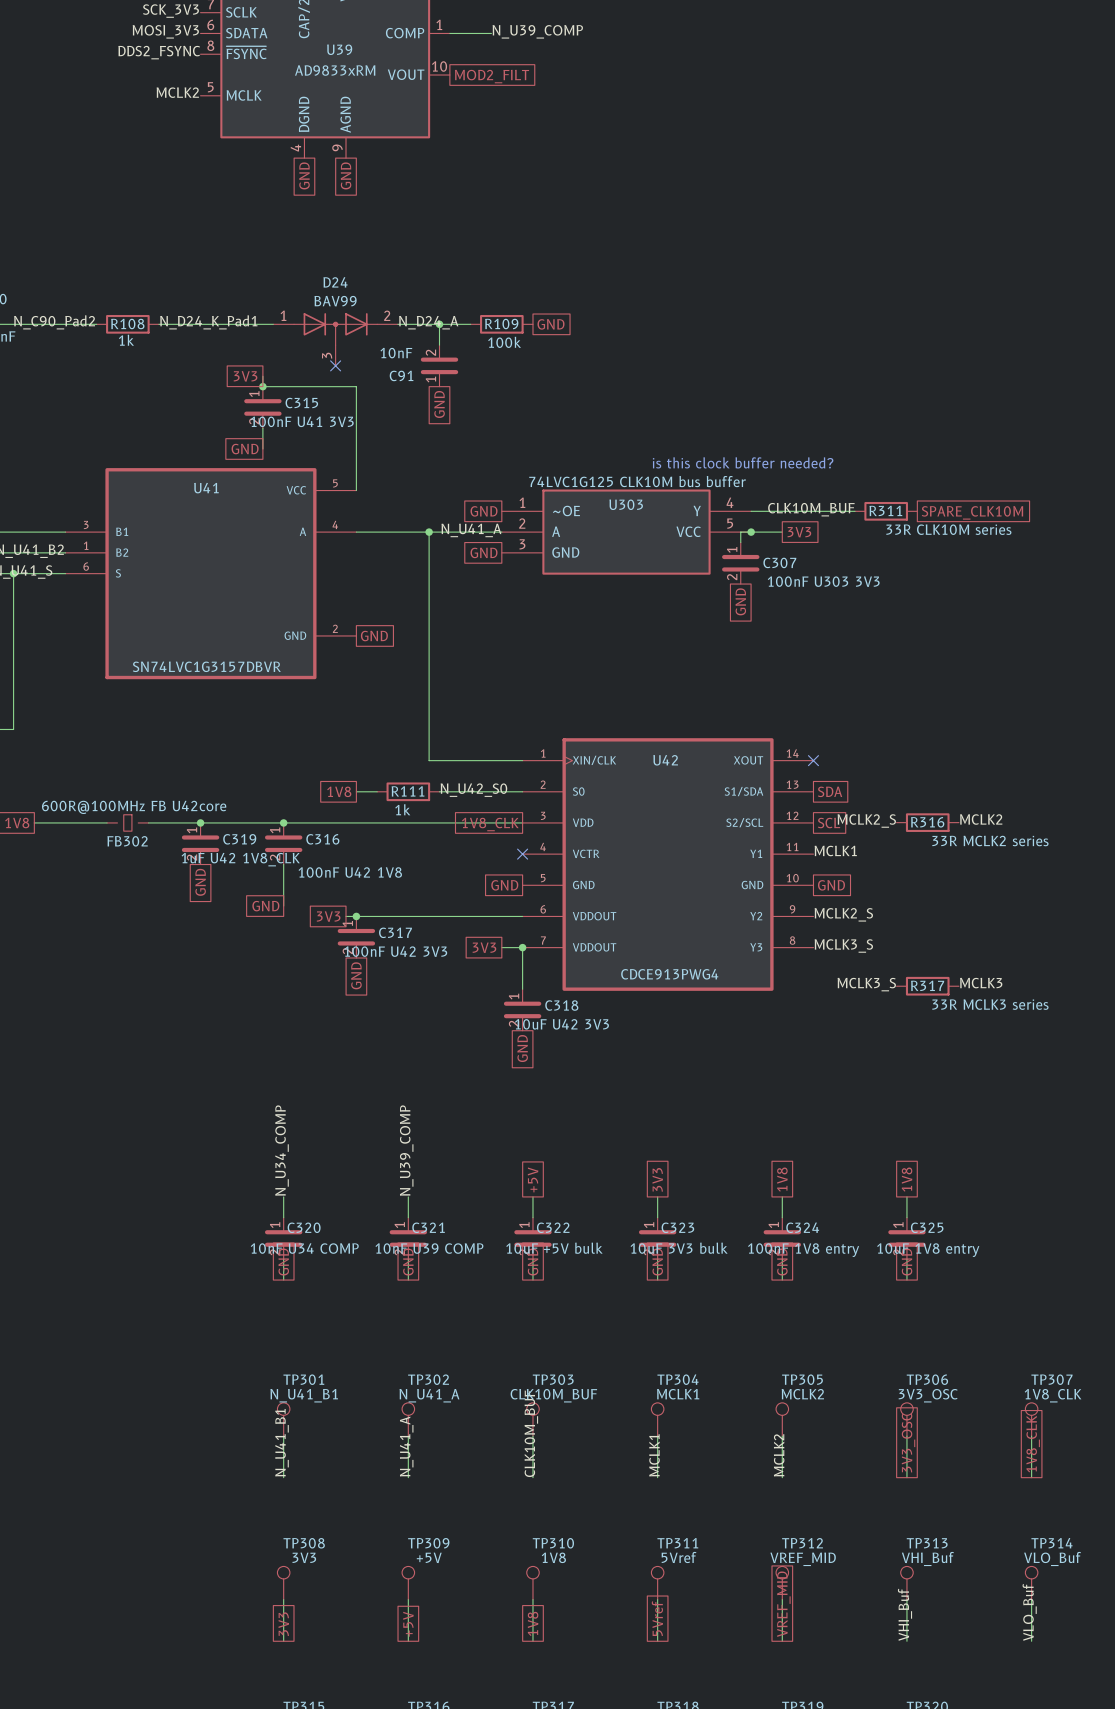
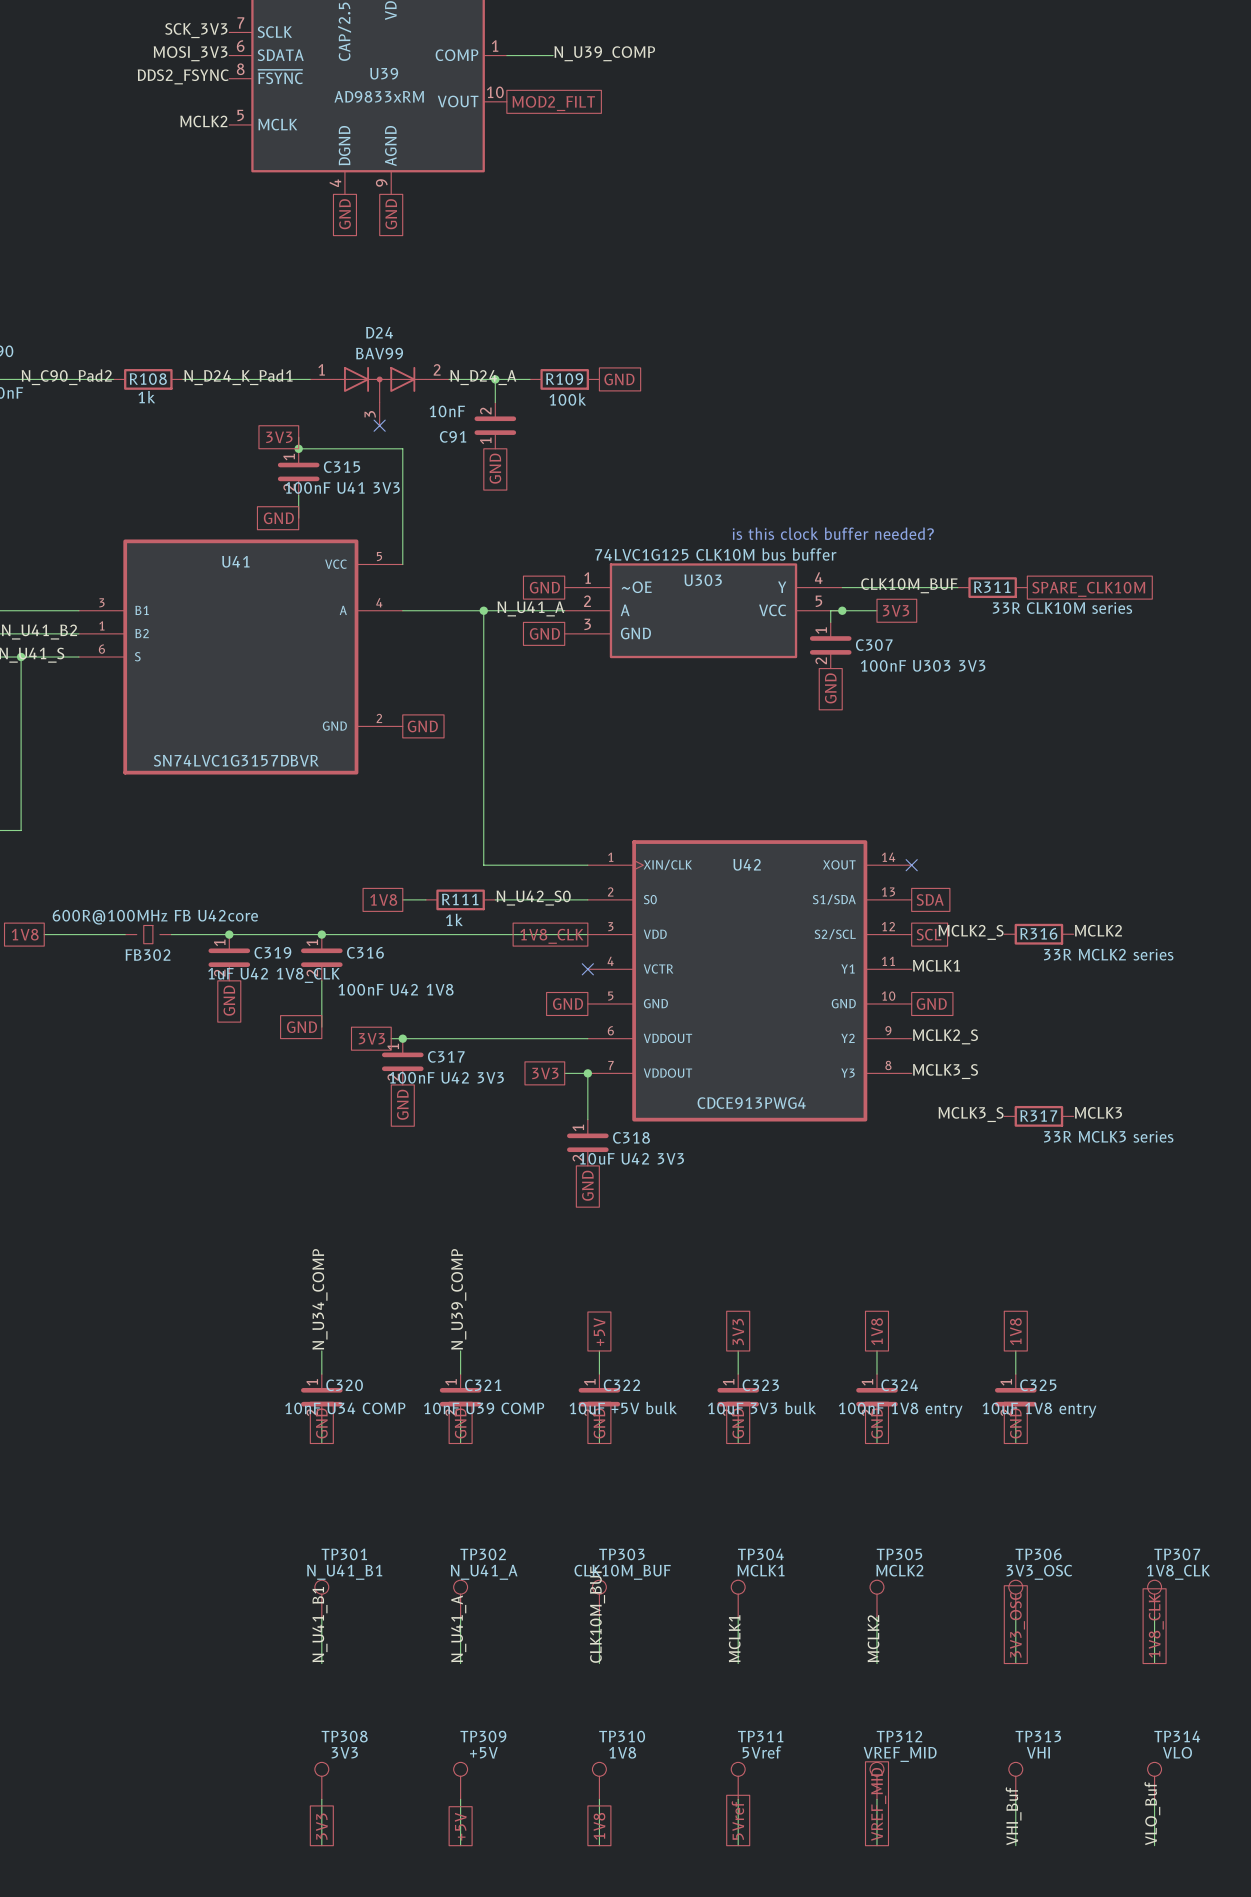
TP313 value: VHI_Buf (927, 1558) -> VHI (1038, 1752)
TP314 value: VLO_Buf (1052, 1558) -> VLO (1177, 1752)

